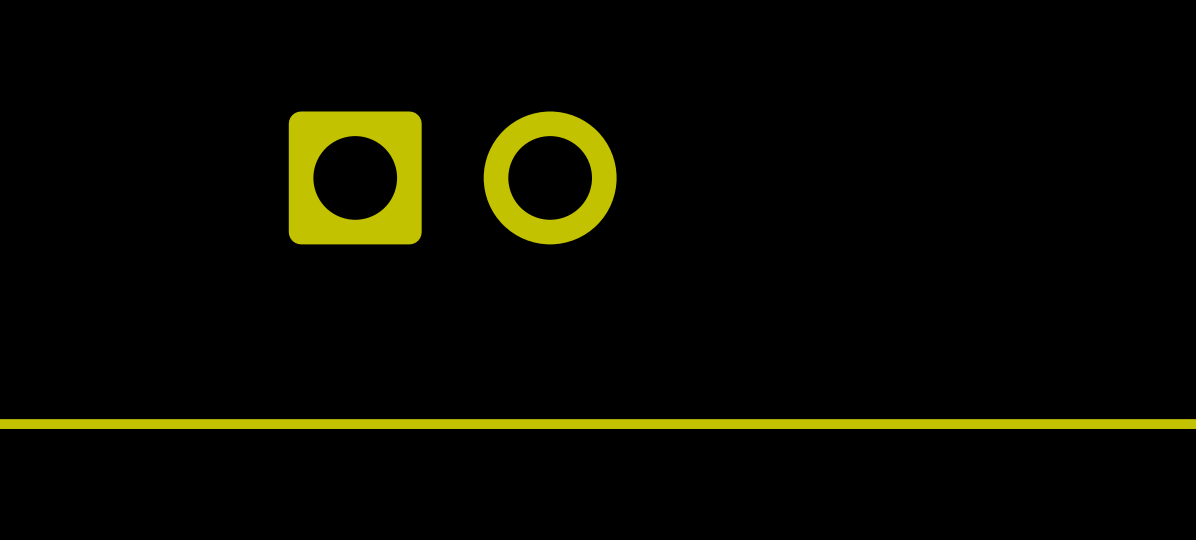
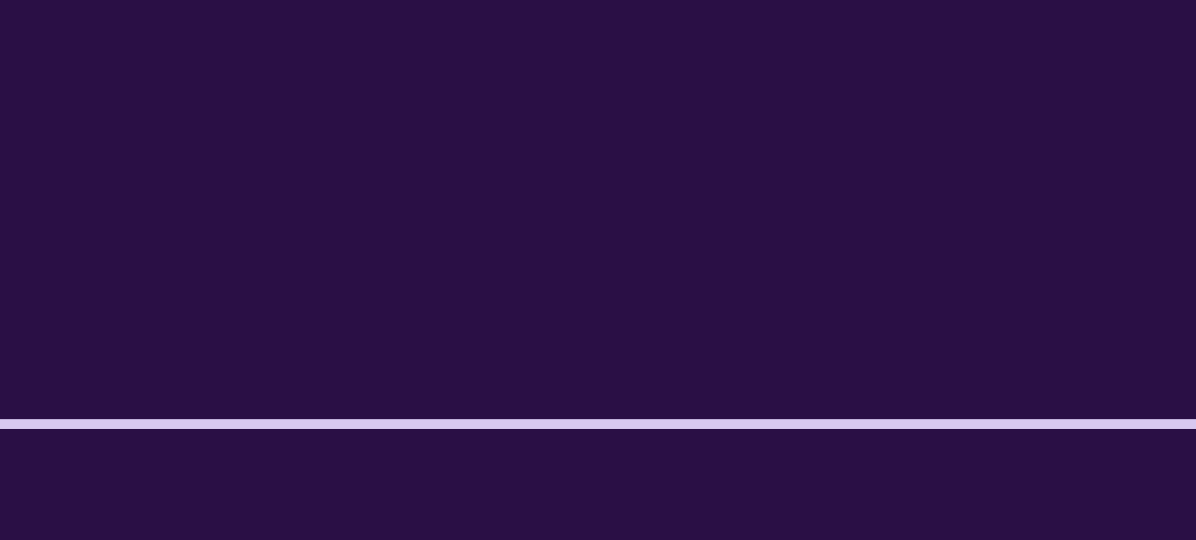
part: (452, 177) -> none

